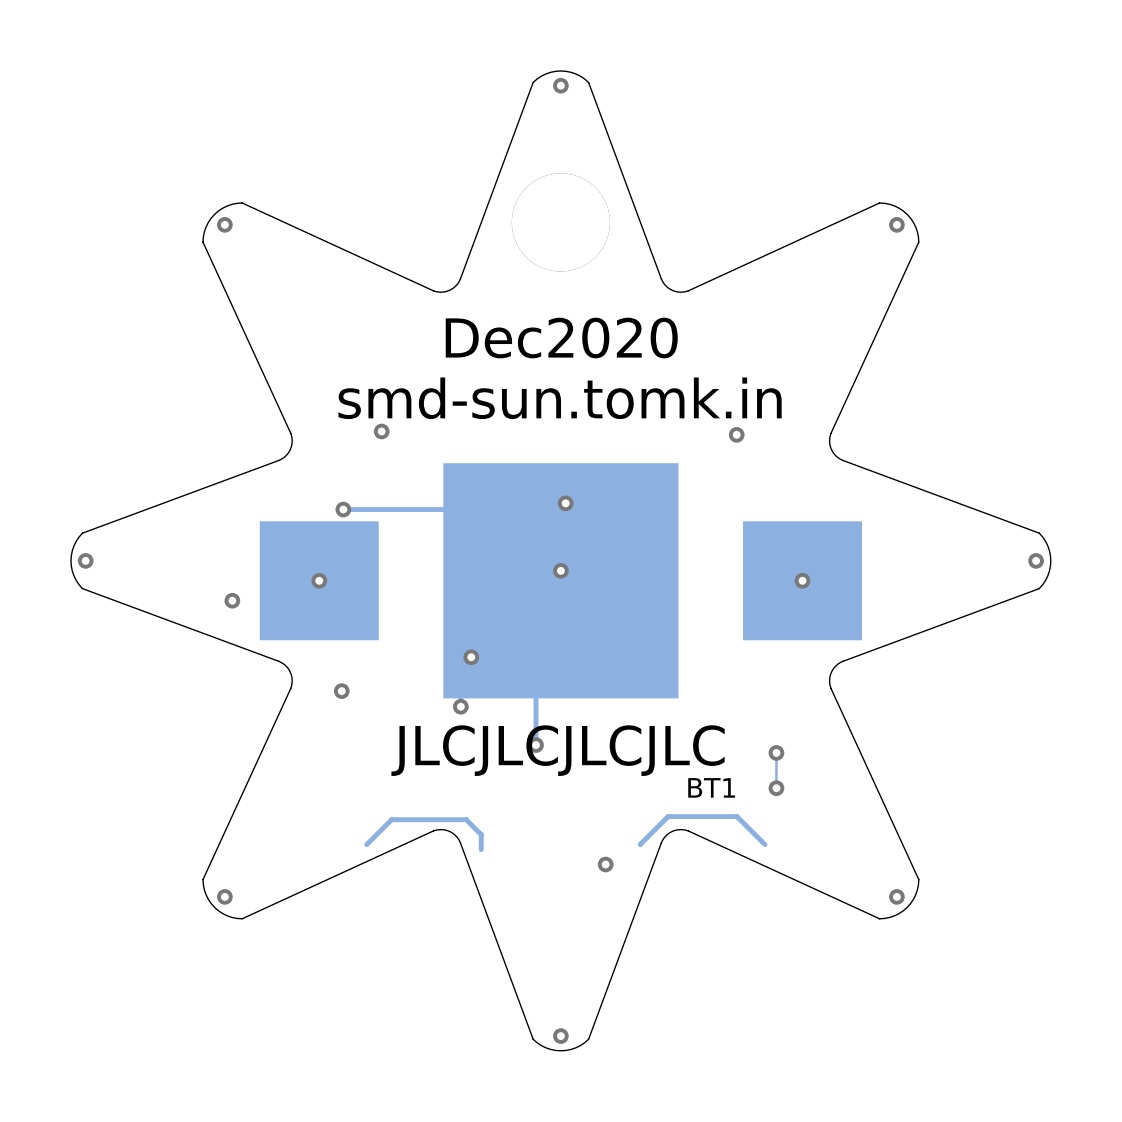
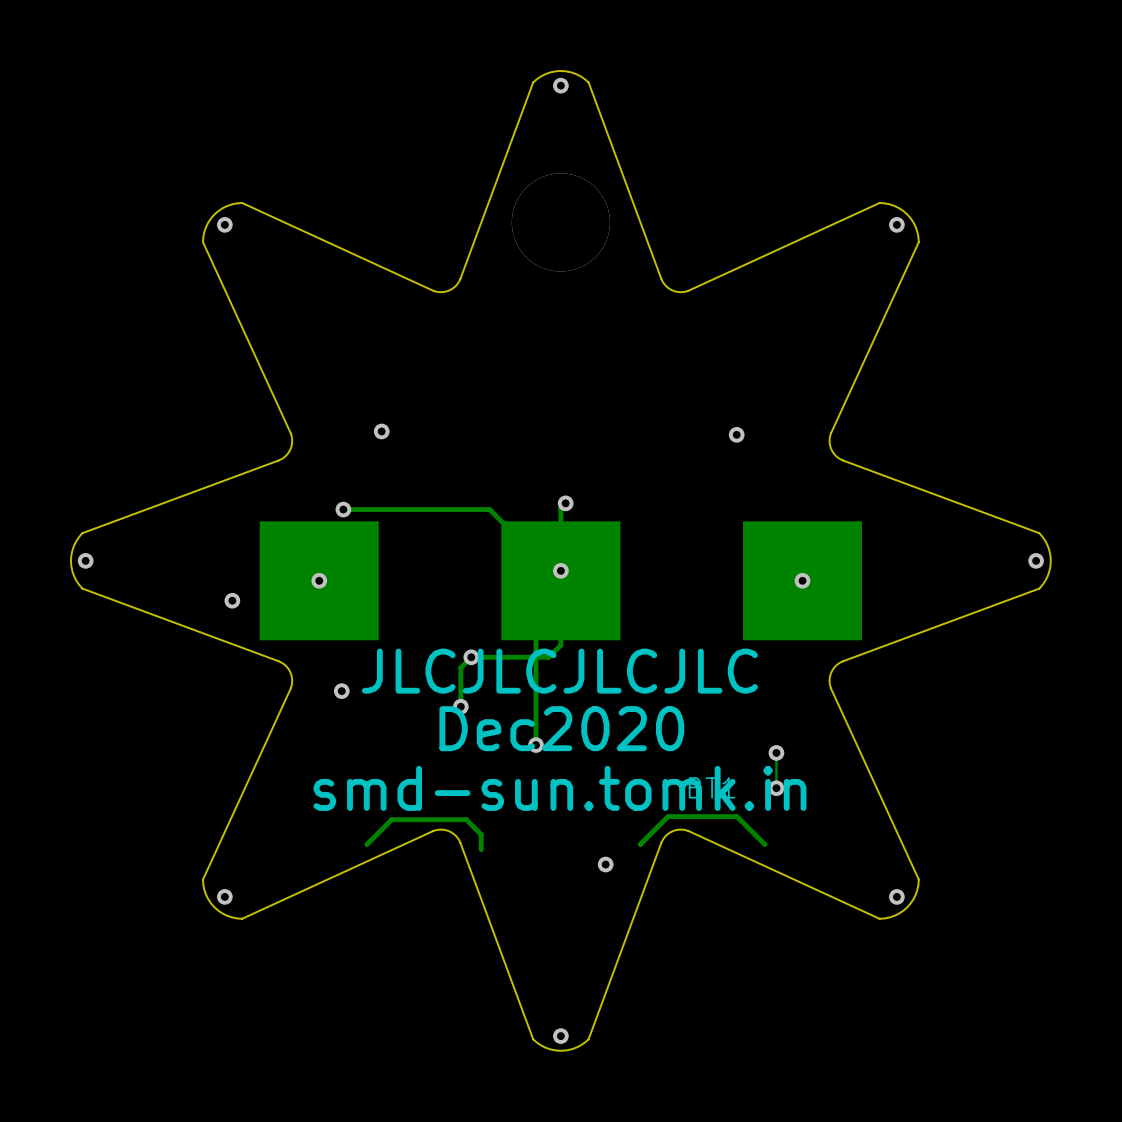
text position: Dec2020 (561, 338) -> Dec2020 (561, 728)
text position: smd-sun.tomk.in (560, 398) -> smd-sun.tomk.in (559, 788)
BT1 footprint: [259, 463, 862, 699] -> [259, 521, 862, 641]
text position: JLCJLCJLCJLC (558, 750) -> JLCJLCJLCJLC (559, 671)

